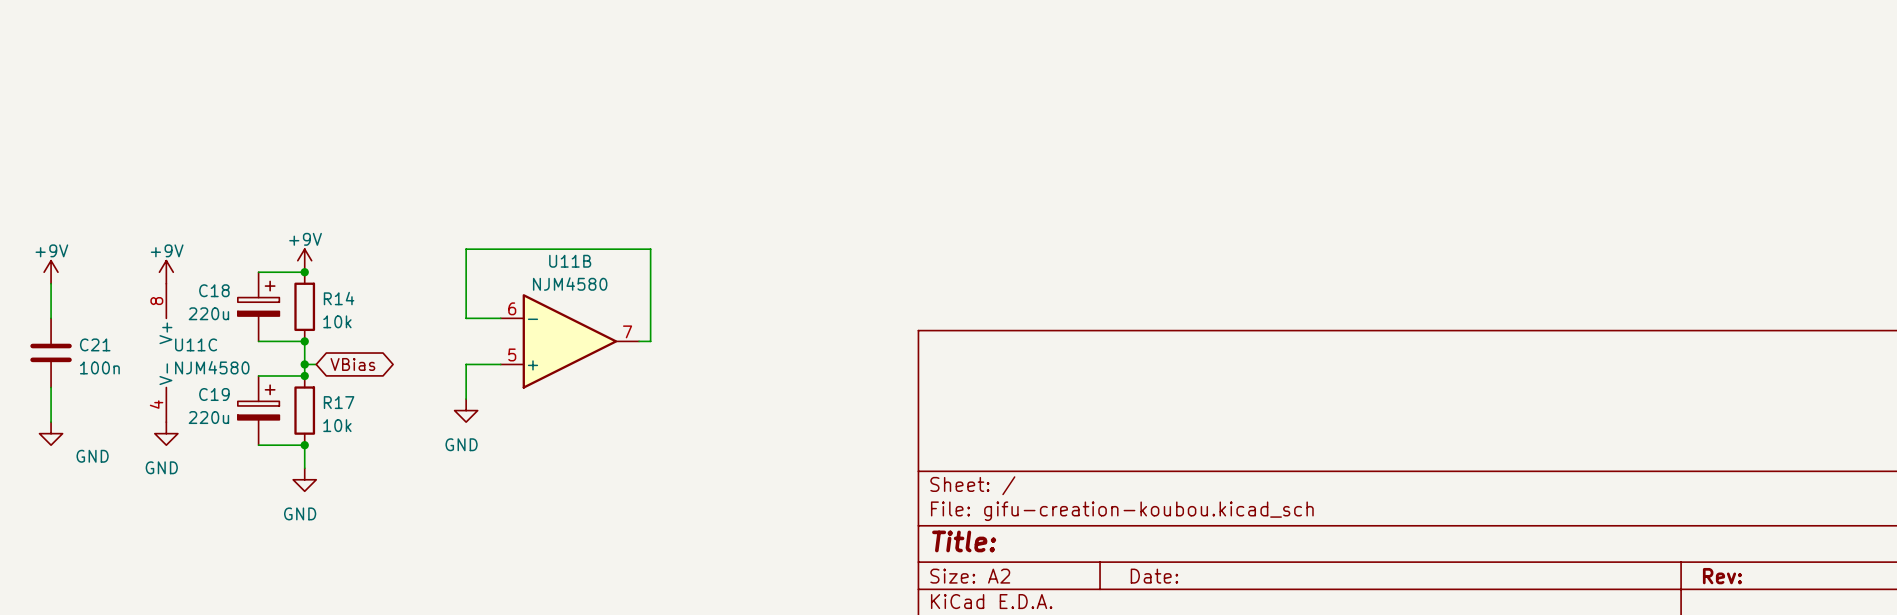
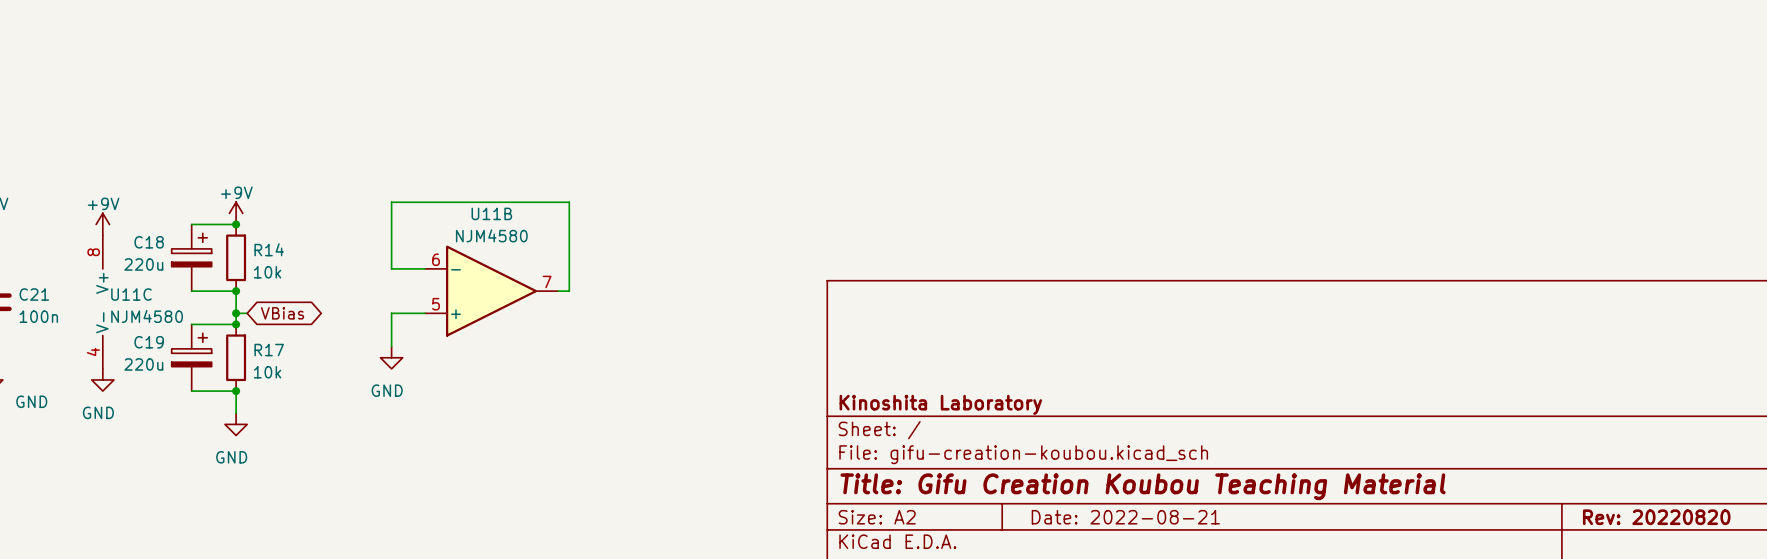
title block: none -> Kinoshita Laboratory (940, 404)
title block: Title: (964, 541) -> Title: Gifu Creation Koubou Teaching Material (1143, 486)
title block: Date: (1154, 576) -> Date: 2022-08-21 (1125, 517)
title block: Rev: (1722, 576) -> Rev: 20220820 (1656, 517)

